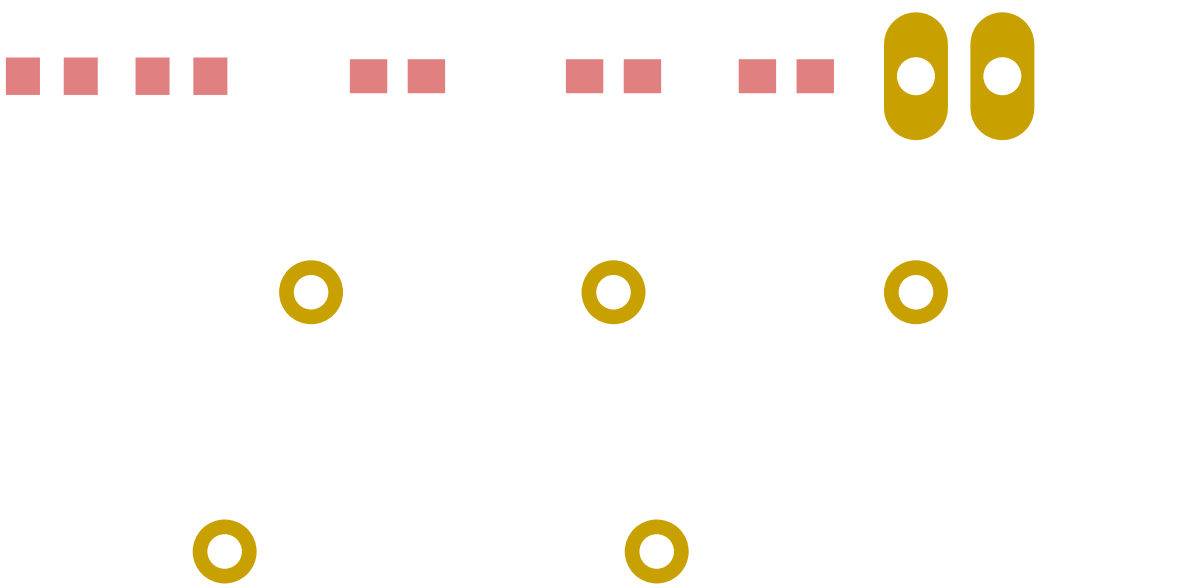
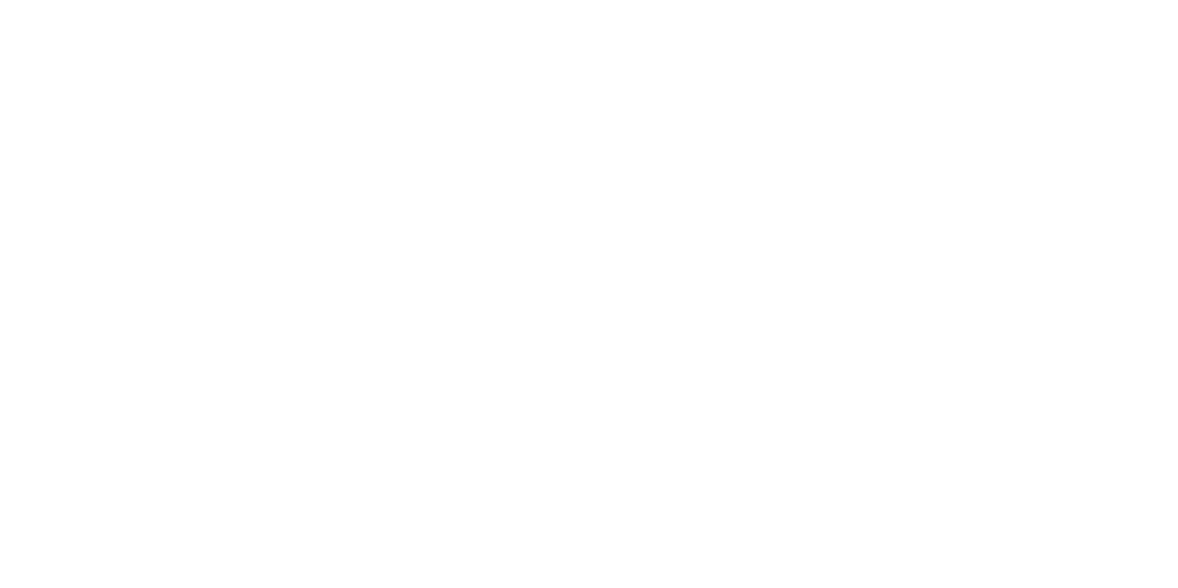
part: (51, 76) -> none
part: (181, 76) -> none
part: (397, 76) -> none
part: (613, 76) -> none
part: (786, 76) -> none
part: (959, 76) -> none
part: (311, 292) -> none
part: (613, 292) -> none
part: (915, 292) -> none
part: (224, 551) -> none
part: (656, 551) -> none

